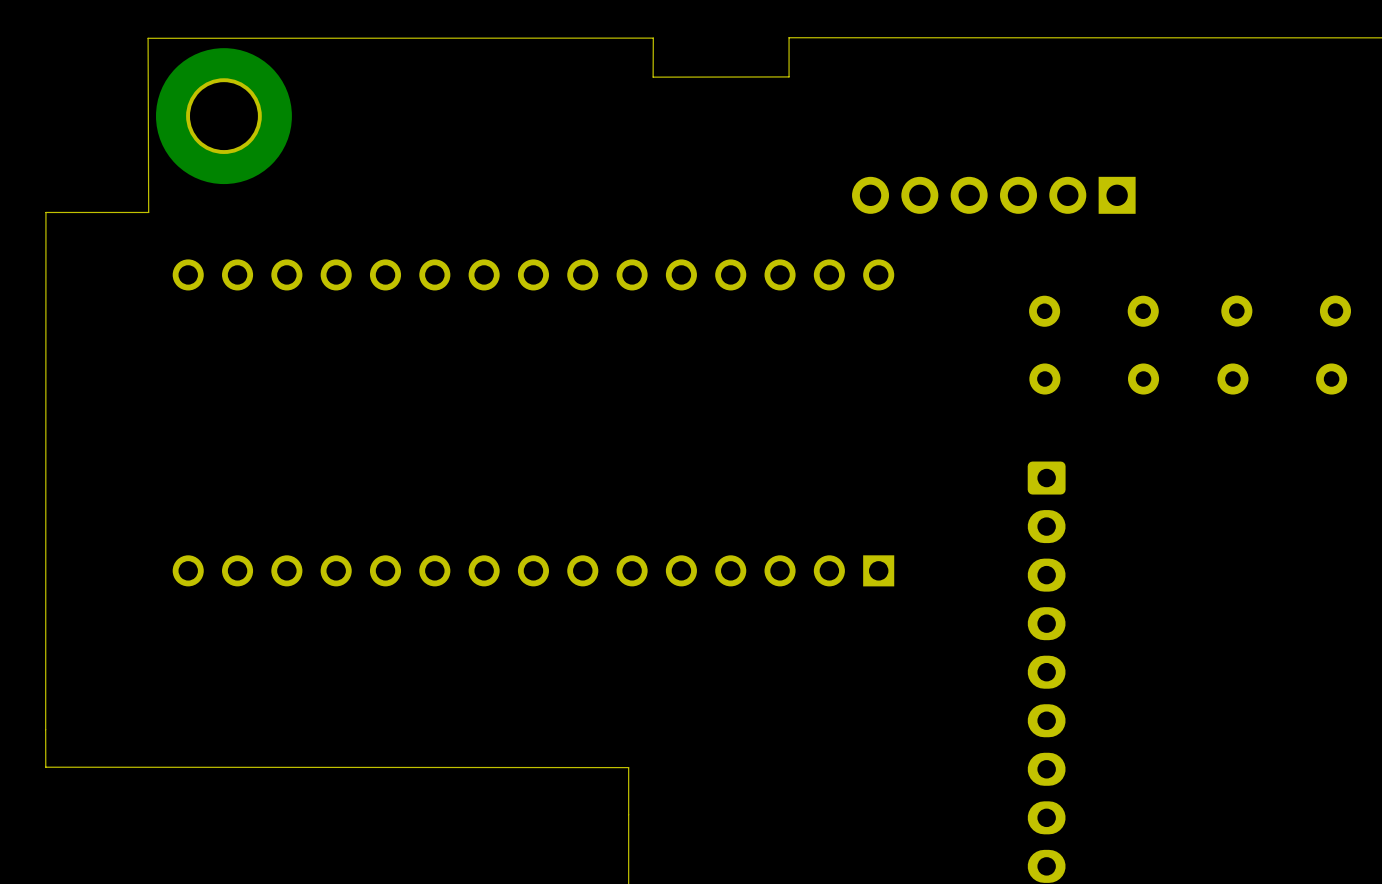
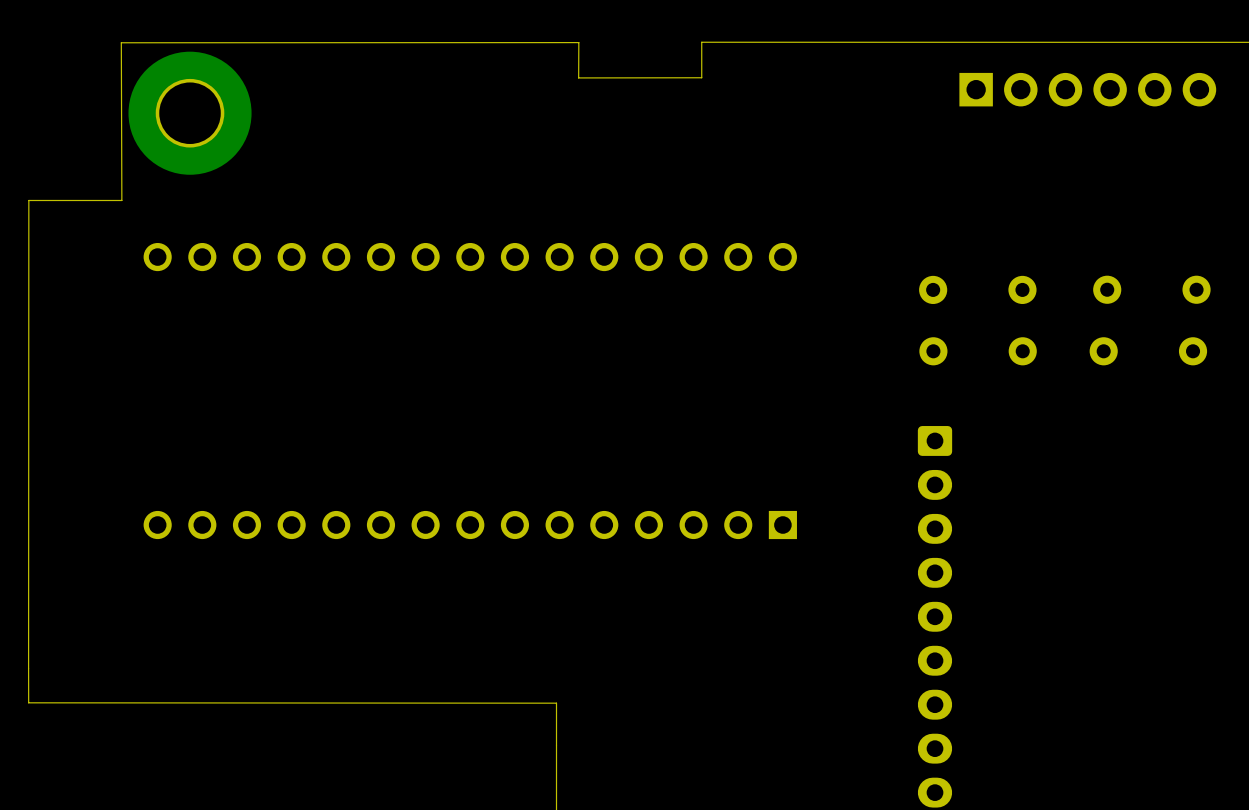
part rotation: 0° (993, 195) -> 180° (1087, 89)
part position: (993, 195) -> (1087, 89)

